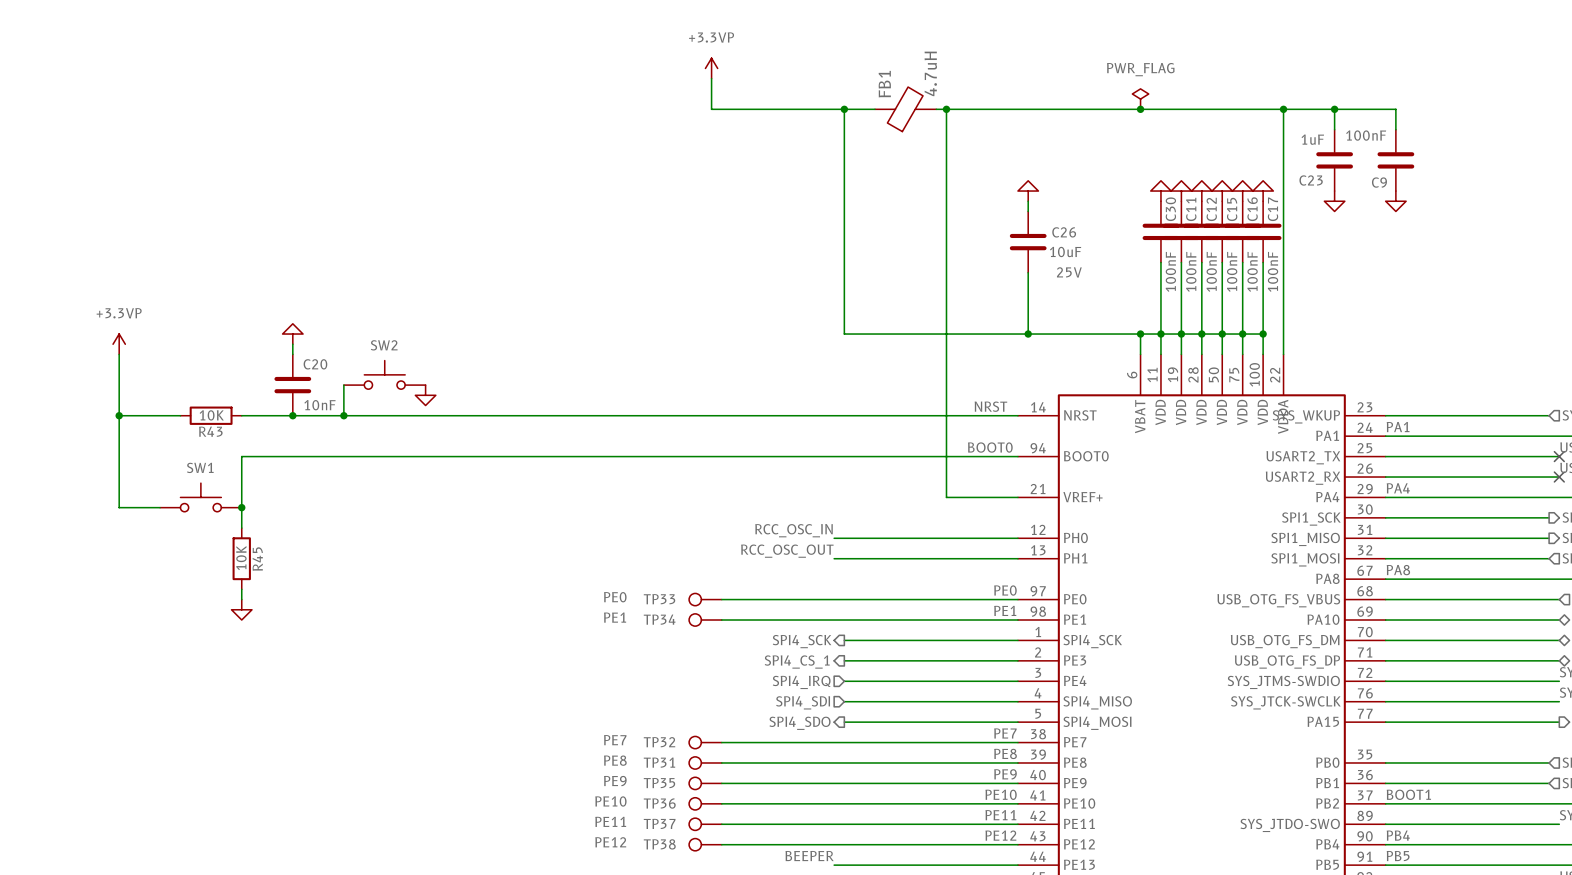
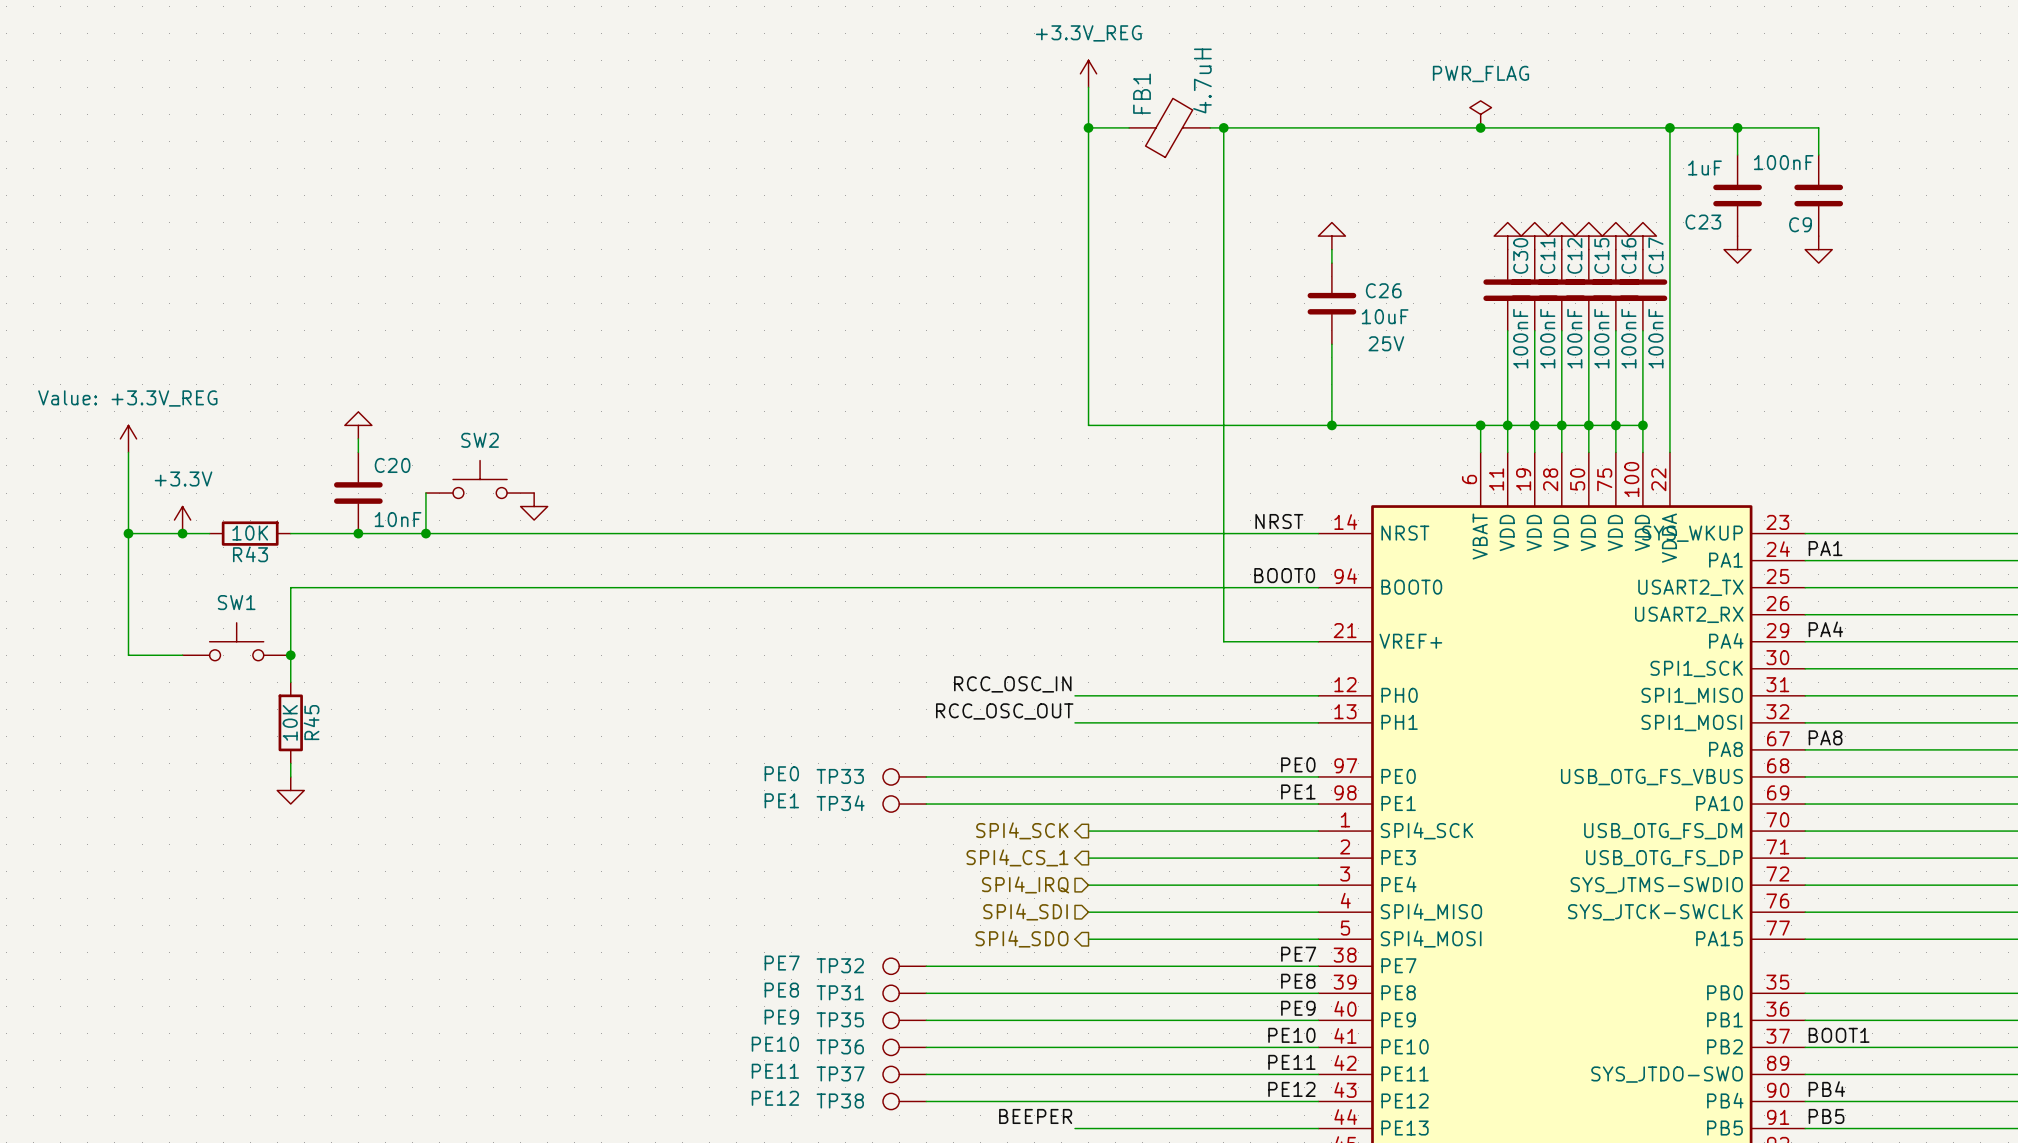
power symbol: +3.3VP (711, 68) -> none
power symbol: none -> +3.3V_REG (1088, 73)
wire: (711, 78) (711, 109) (844, 109) -> (1088, 87) (1088, 127)
power symbol: +3.3VP (119, 344) -> Value: +3.3V_REG (128, 438)
power symbol: none -> +3.3V (182, 520)
junction: none -> (182, 533)

